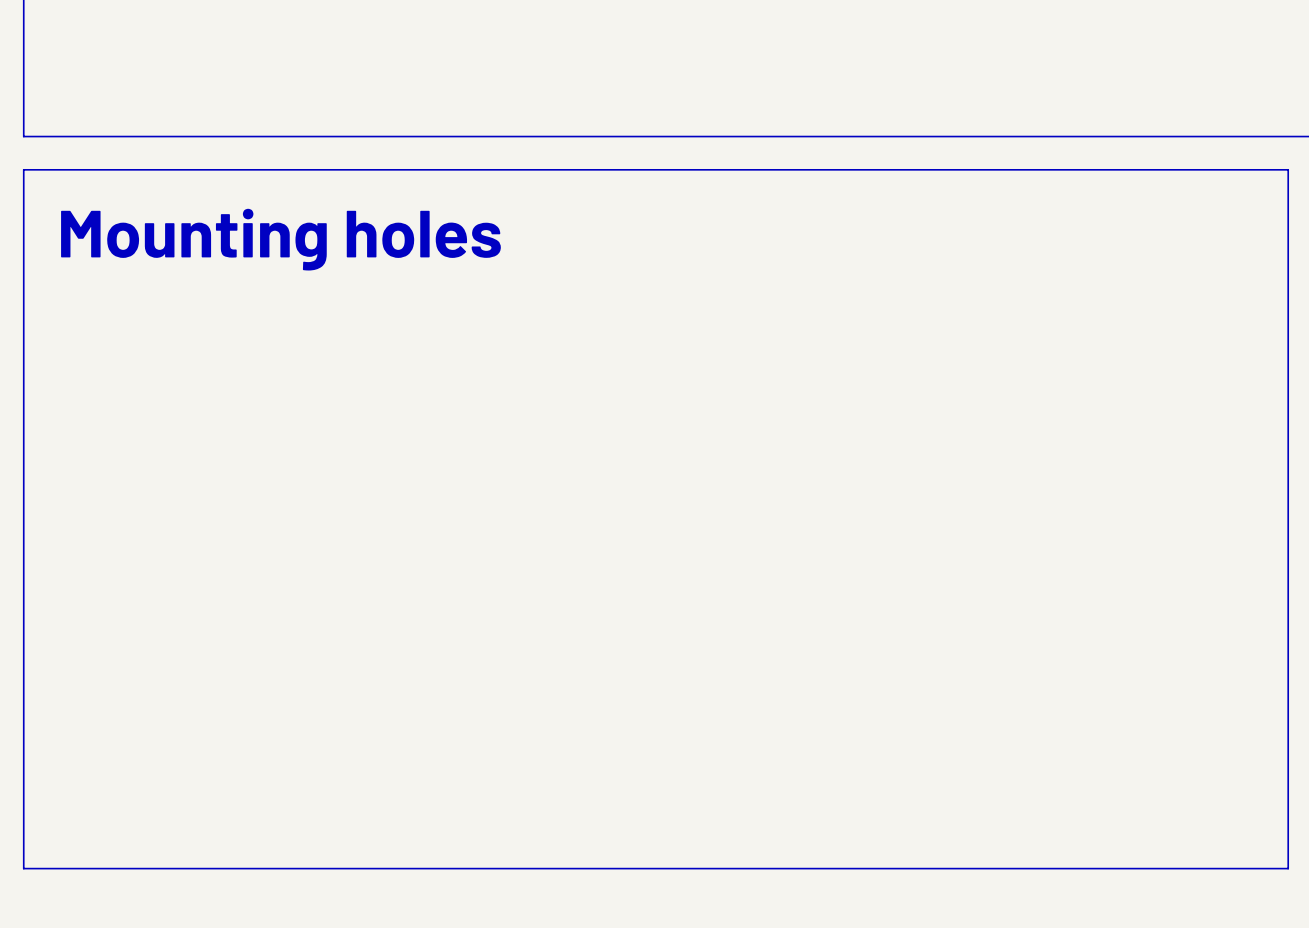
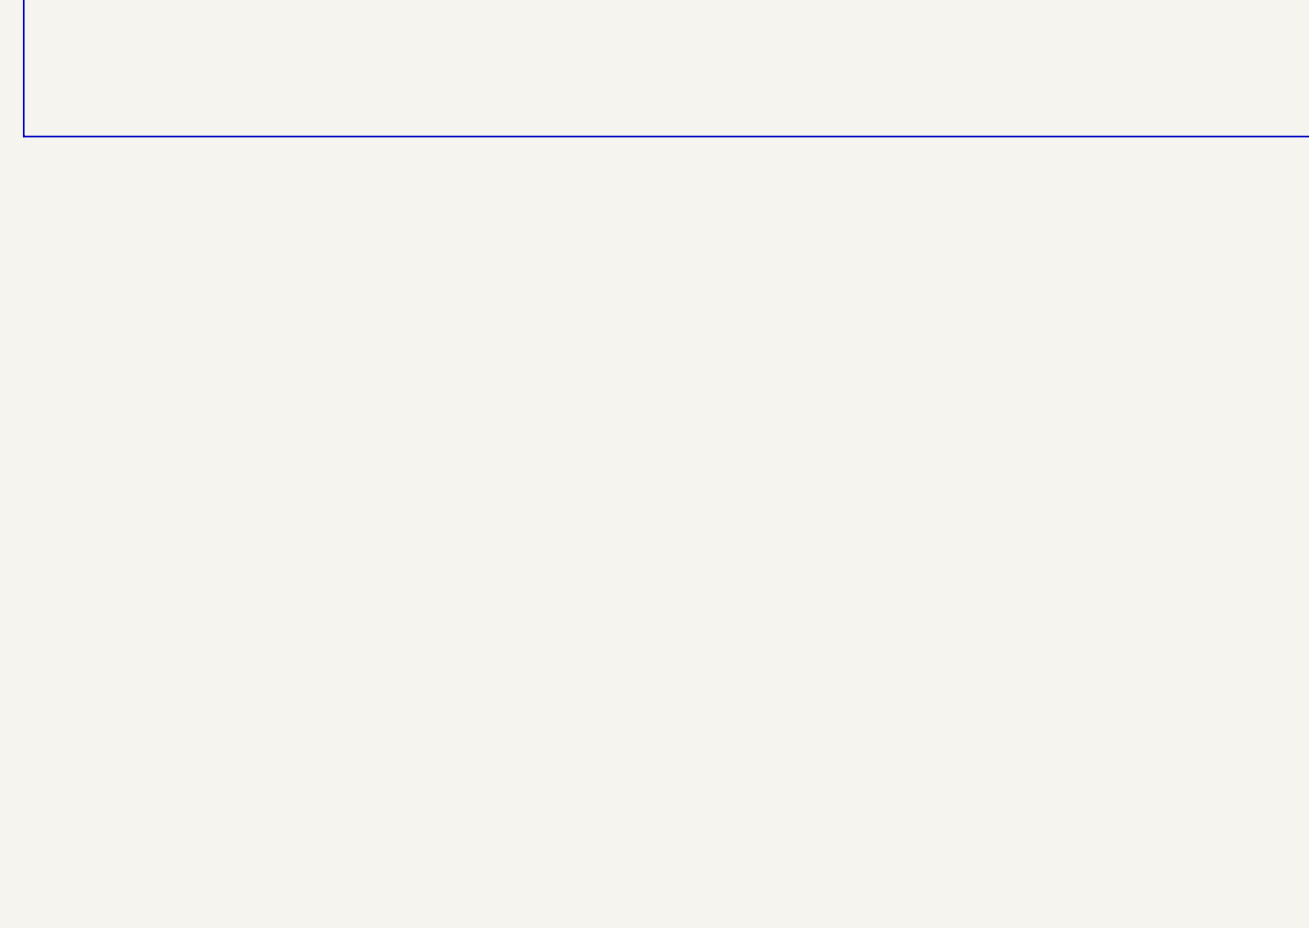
line: (23, 169) (1288, 169) (1288, 868) (23, 868) (23, 169) -> none
text: Mounting holes (280, 239) -> none

